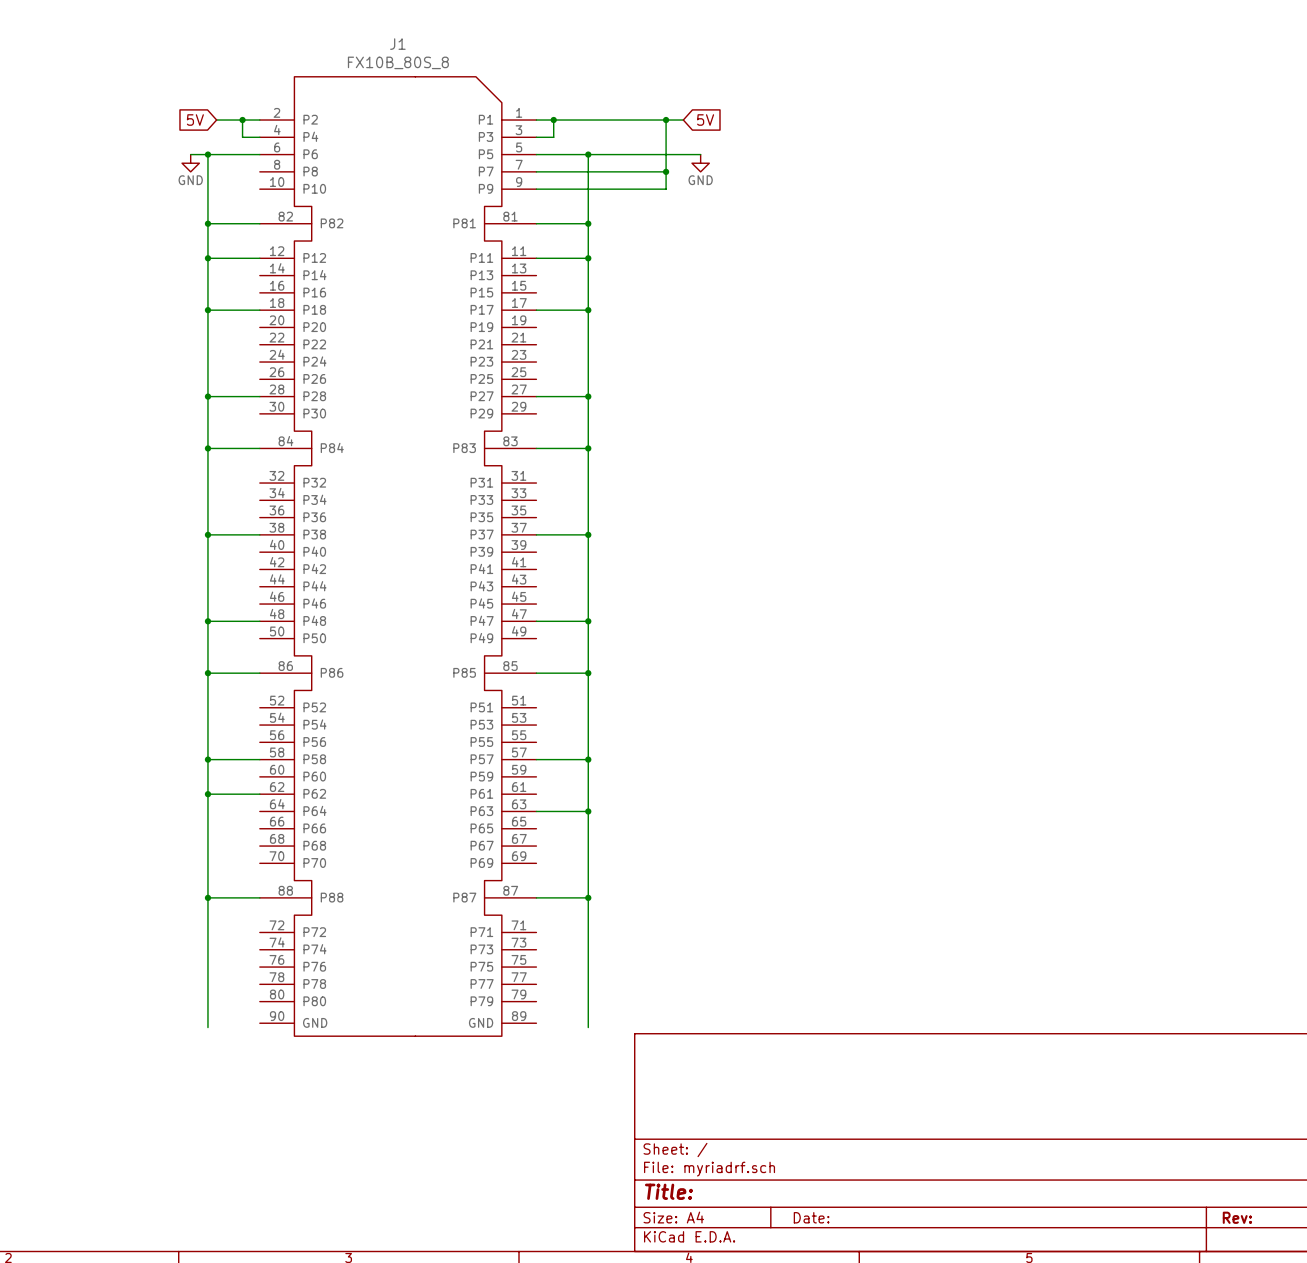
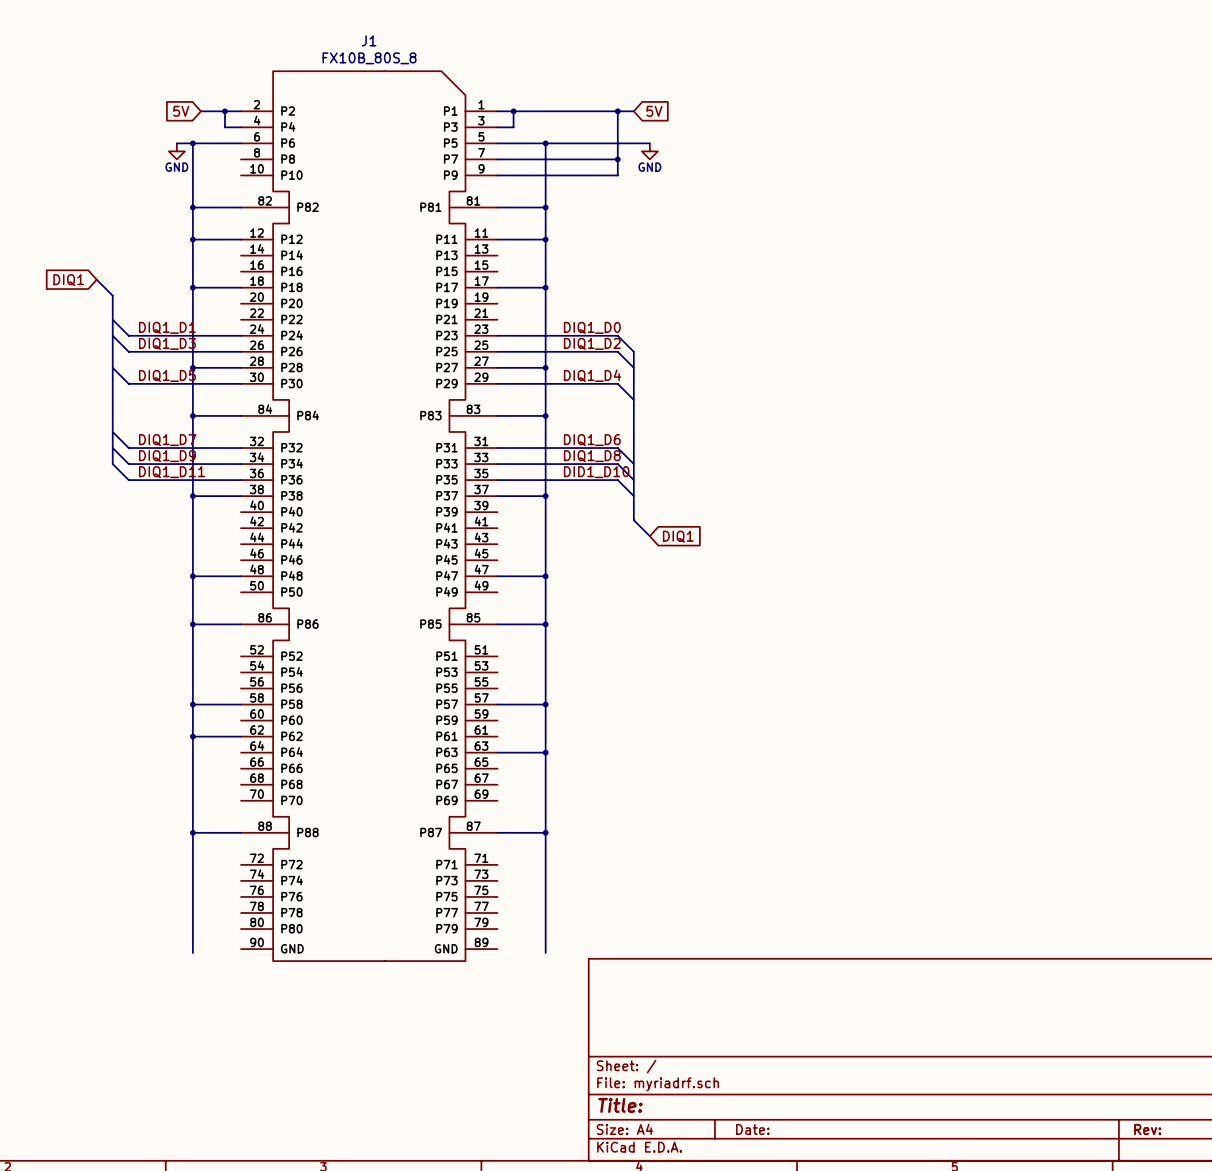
bus: none -> (96, 279) (112, 295) (112, 464)
global label: none -> DIQ1 (68, 280)
wire: none -> (112, 319) (128, 335) (241, 335)
label: none -> DIQ1_D1 (167, 327)
label: none -> DIQ1_D0 (592, 327)
wire: none -> (112, 335) (128, 351) (241, 351)
wire: none -> (497, 335) (617, 335) (633, 351)
label: none -> DIQ1_D3 (167, 343)
label: none -> DIQ1_D2 (592, 343)
wire: none -> (497, 351) (617, 351) (633, 367)
bus: none -> (633, 351) (633, 520) (649, 536)
wire: none -> (112, 367) (128, 383) (241, 383)
label: none -> DIQ1_D5 (167, 375)
label: none -> DIQ1_D4 (592, 375)
wire: none -> (497, 383) (617, 383) (633, 399)
wire: none -> (112, 431) (128, 448) (241, 448)
label: none -> DIQ1_D7 (167, 440)
label: none -> DIQ1_D6 (592, 440)
wire: none -> (112, 448) (128, 464) (241, 464)
wire: none -> (497, 448) (617, 448) (633, 464)
label: none -> DIQ1_D9 (167, 456)
label: none -> DIQ1_D8 (592, 456)
wire: none -> (112, 464) (128, 480) (241, 480)
wire: none -> (497, 464) (617, 464) (633, 480)
label: none -> DIQ1_D11 (172, 472)
label: none -> DID1_D10 (596, 472)
wire: none -> (497, 480) (617, 480) (633, 496)
global label: none -> DIQ1 (678, 536)

